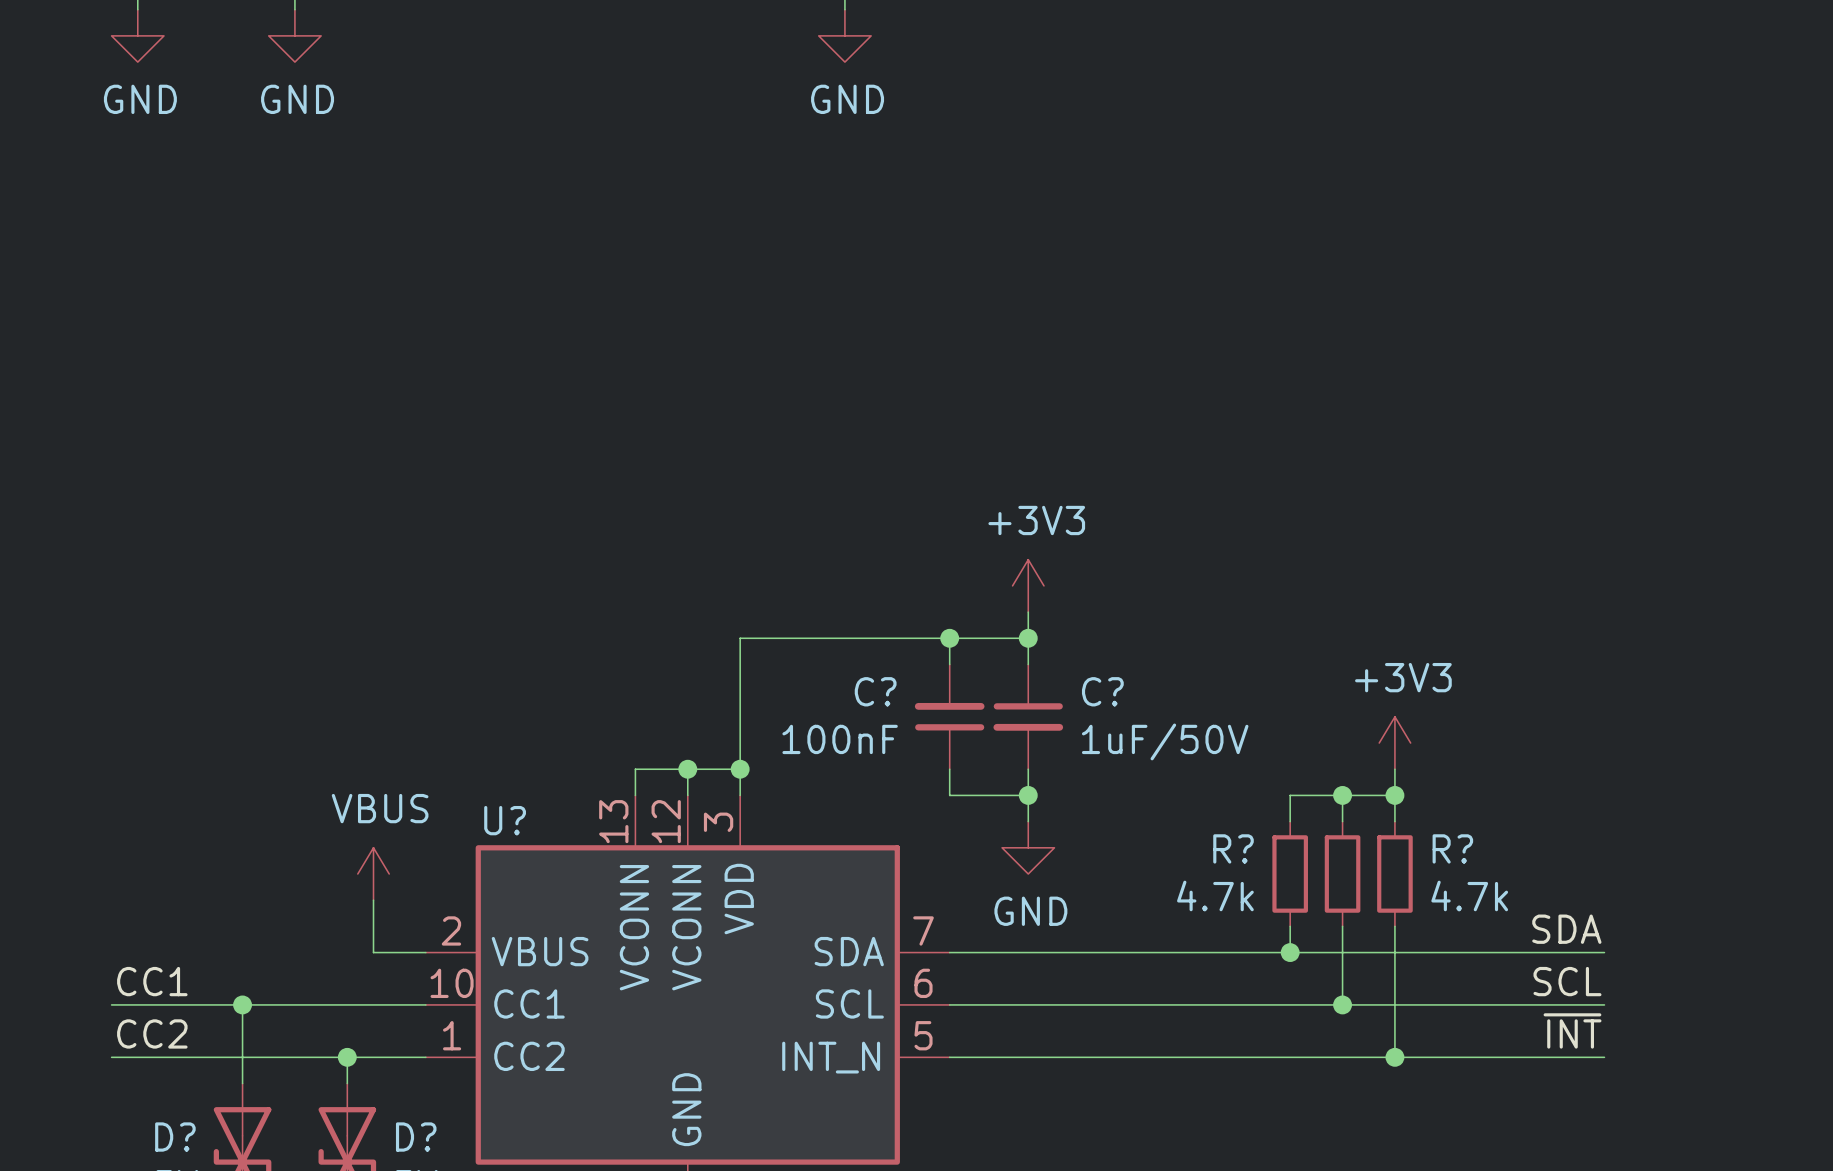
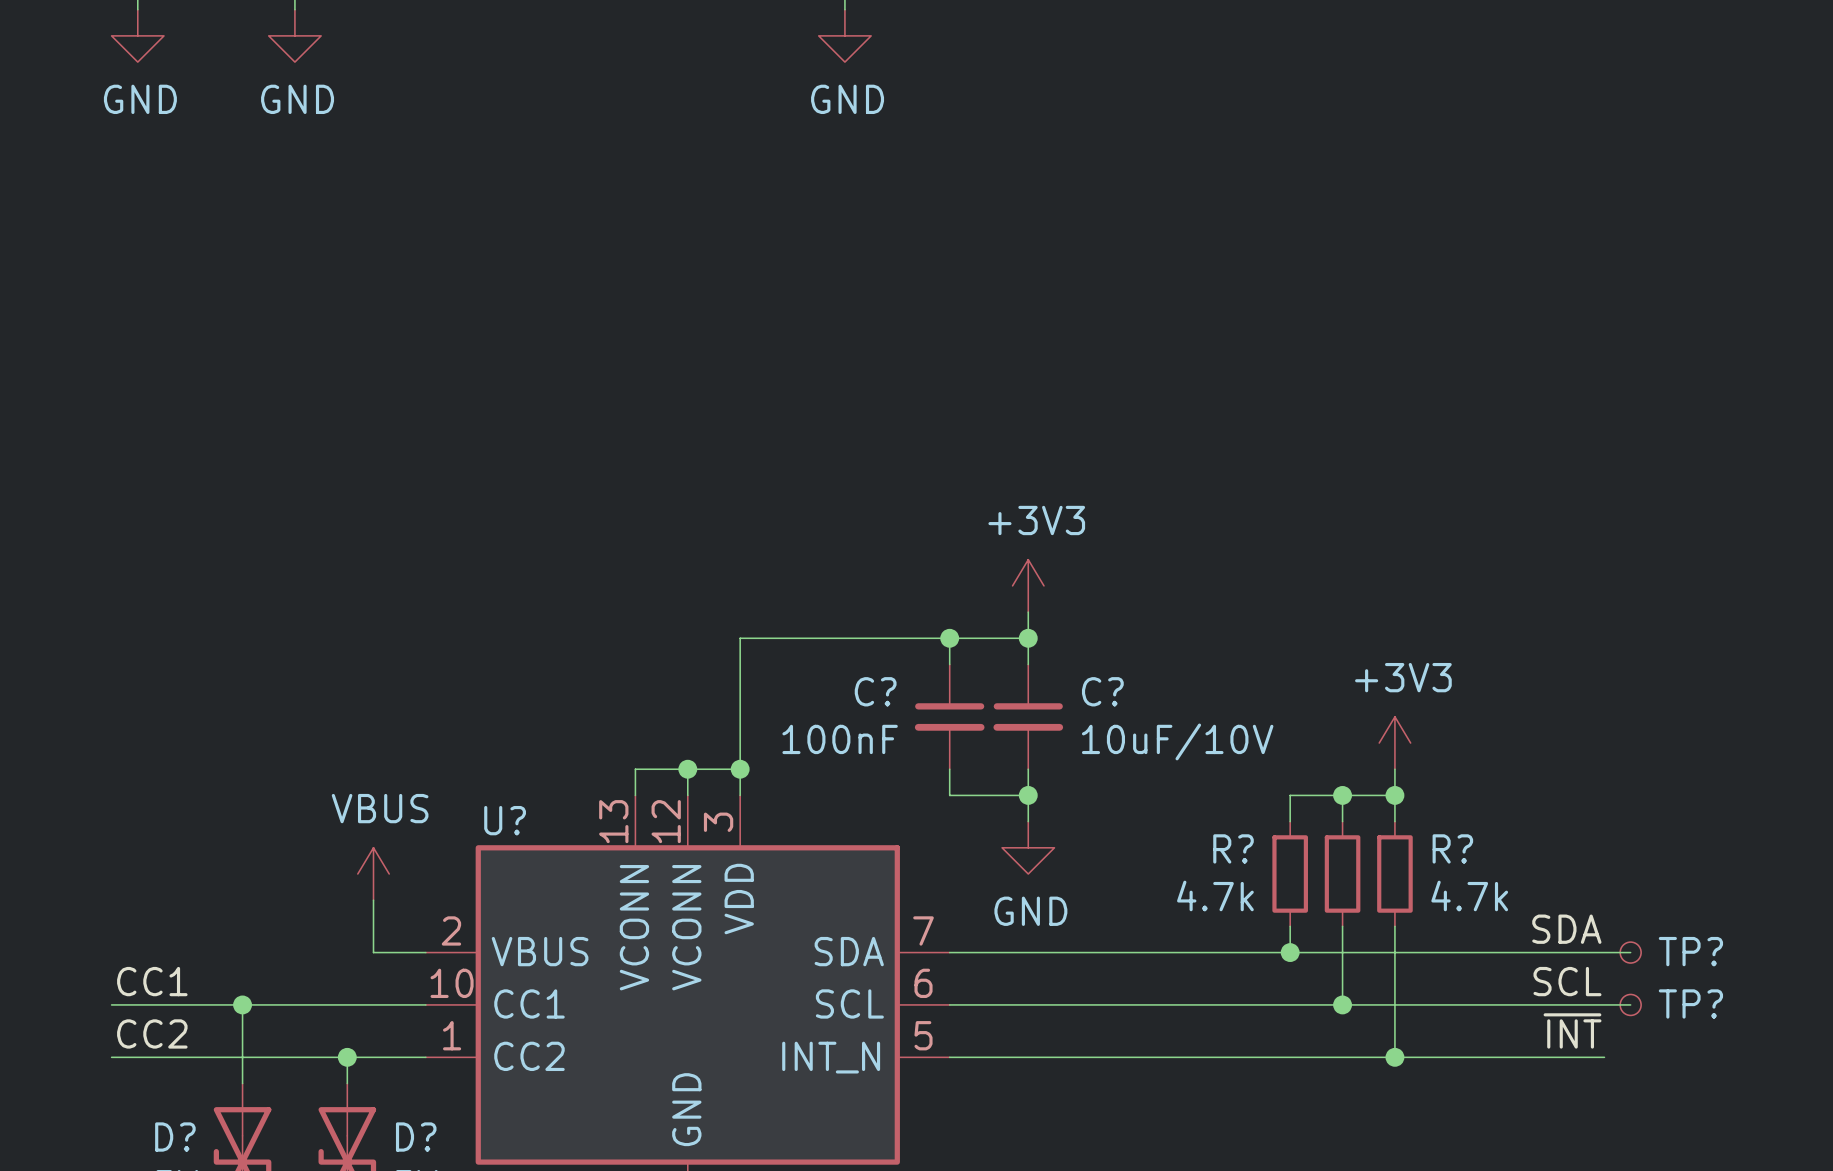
C? rotation: 0° (949, 716) -> 180° (949, 716)
C? value: 1uF/50V (1165, 741) -> 10uF/10V (1177, 741)
wire: none -> (1604, 952) (1630, 952)
TP?: none -> (1630, 952)
wire: none -> (1604, 1004) (1630, 1004)
TP?: none -> (1630, 1004)

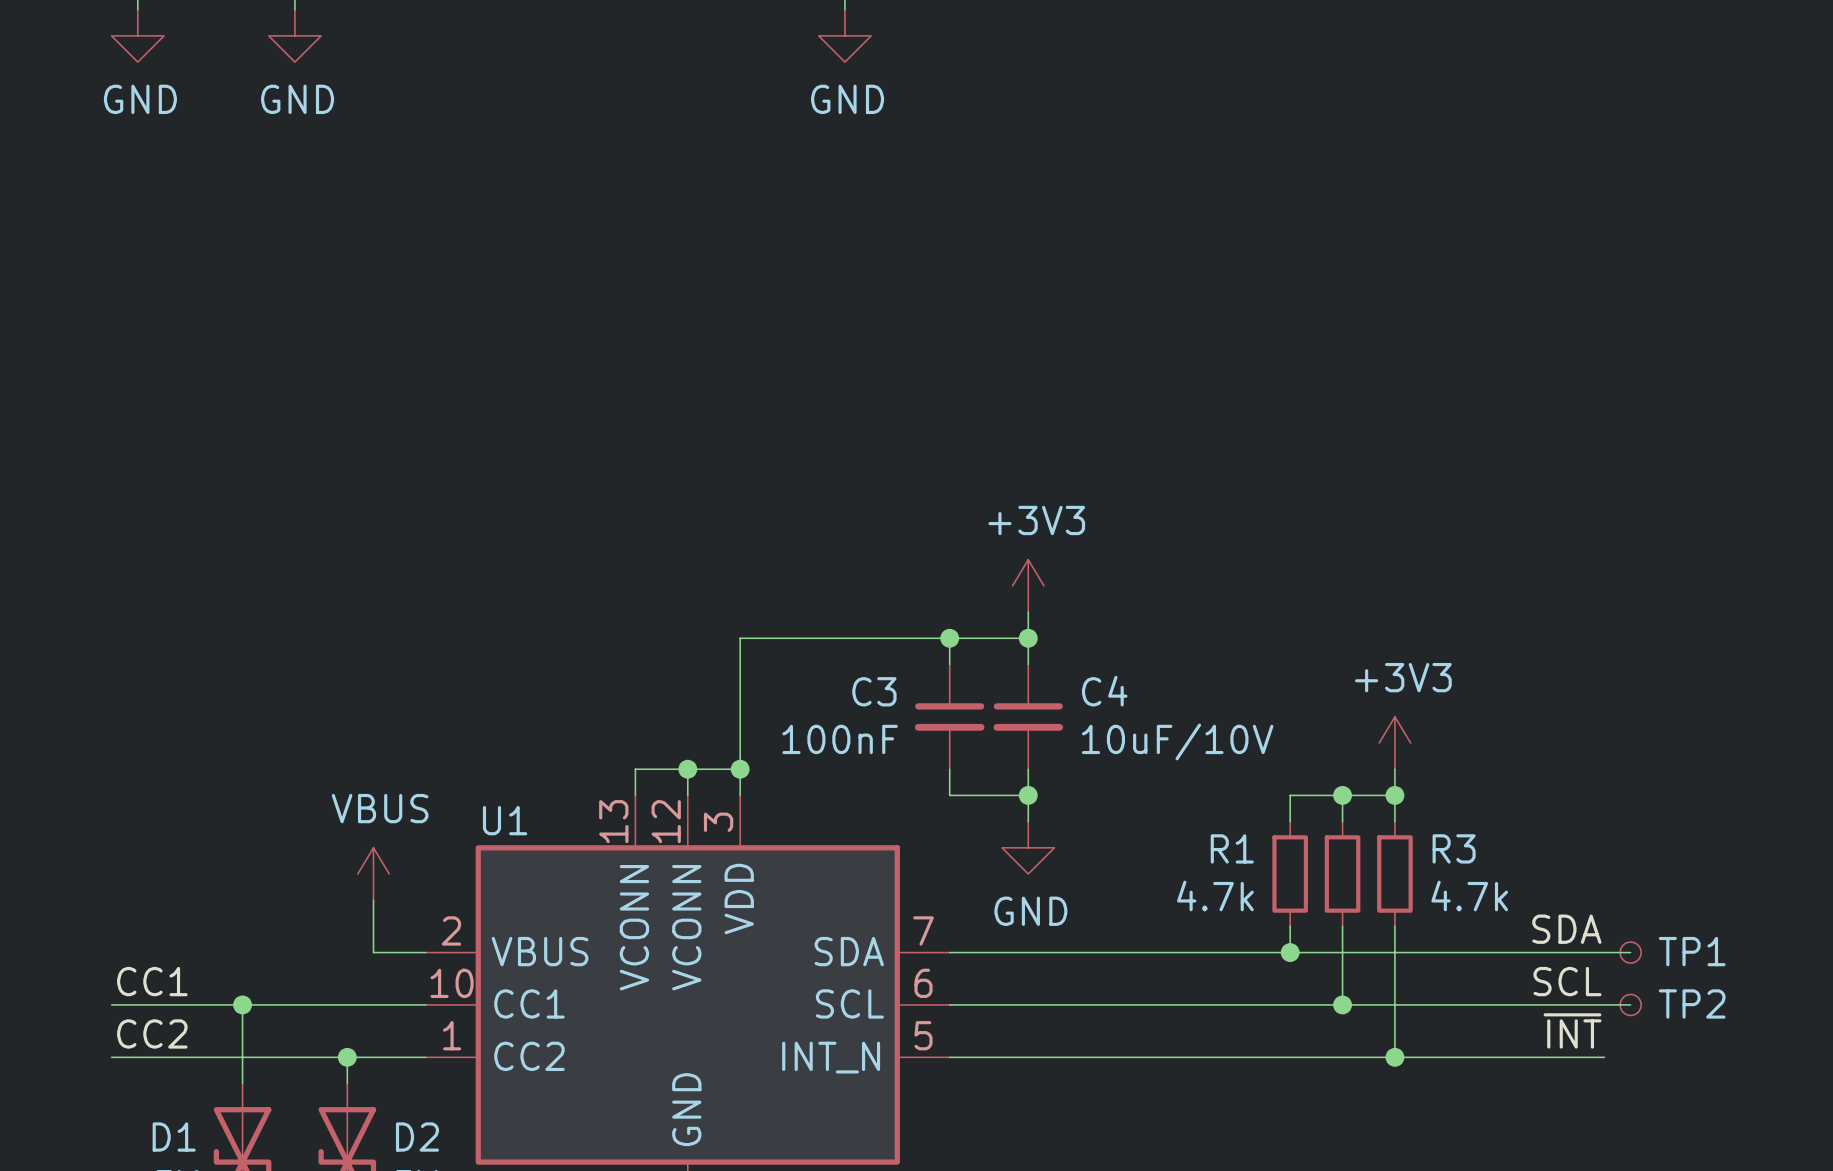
C? name: C? (875, 691) -> C3 (874, 691)
C? name: C? (1102, 691) -> C4 (1104, 691)
U? name: U? (505, 820) -> U1 (505, 820)
R? name: R? (1233, 848) -> R1 (1232, 848)
R? name: R? (1452, 848) -> R3 (1454, 848)
TP? name: TP? (1690, 951) -> TP1 (1692, 951)
TP? name: TP? (1690, 1003) -> TP2 (1692, 1003)
D? name: D? (175, 1137) -> D1 (174, 1137)
D? name: D? (416, 1137) -> D2 (417, 1137)

